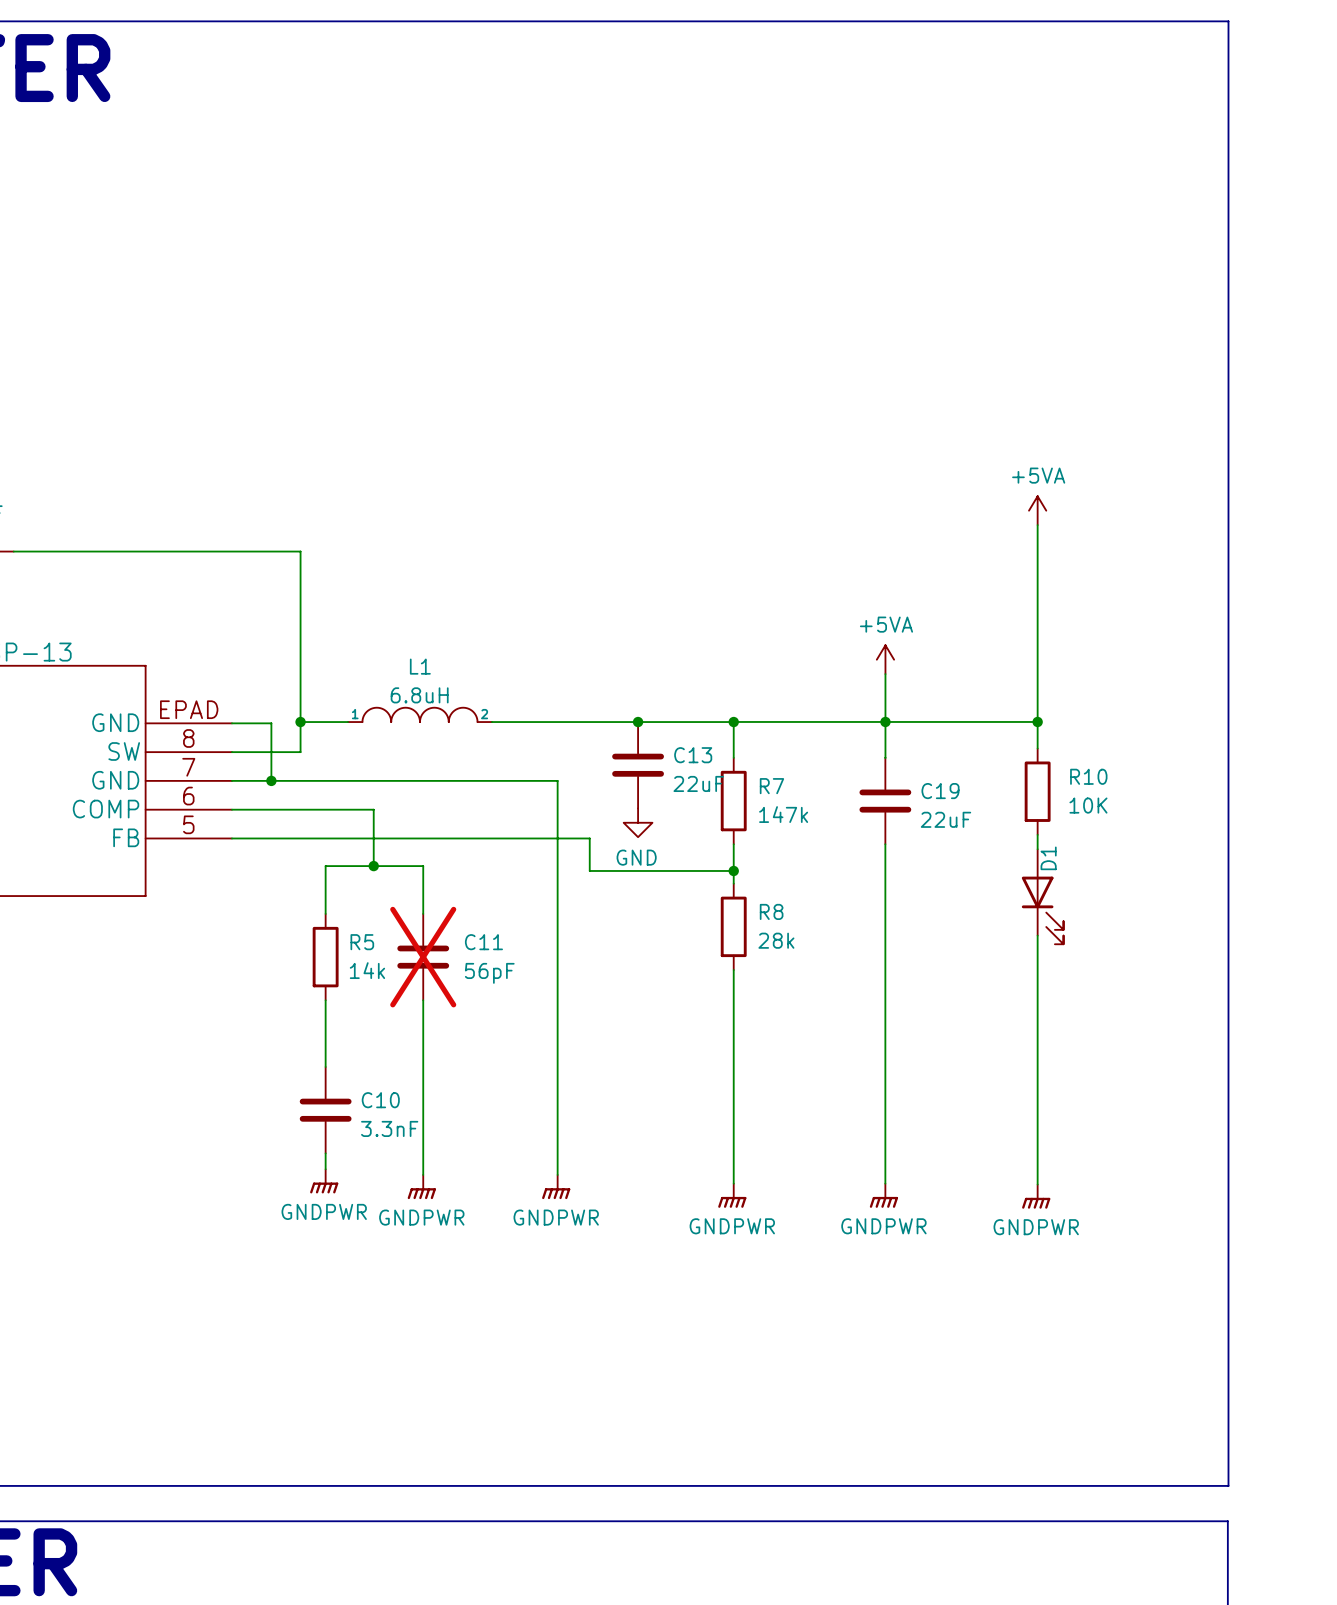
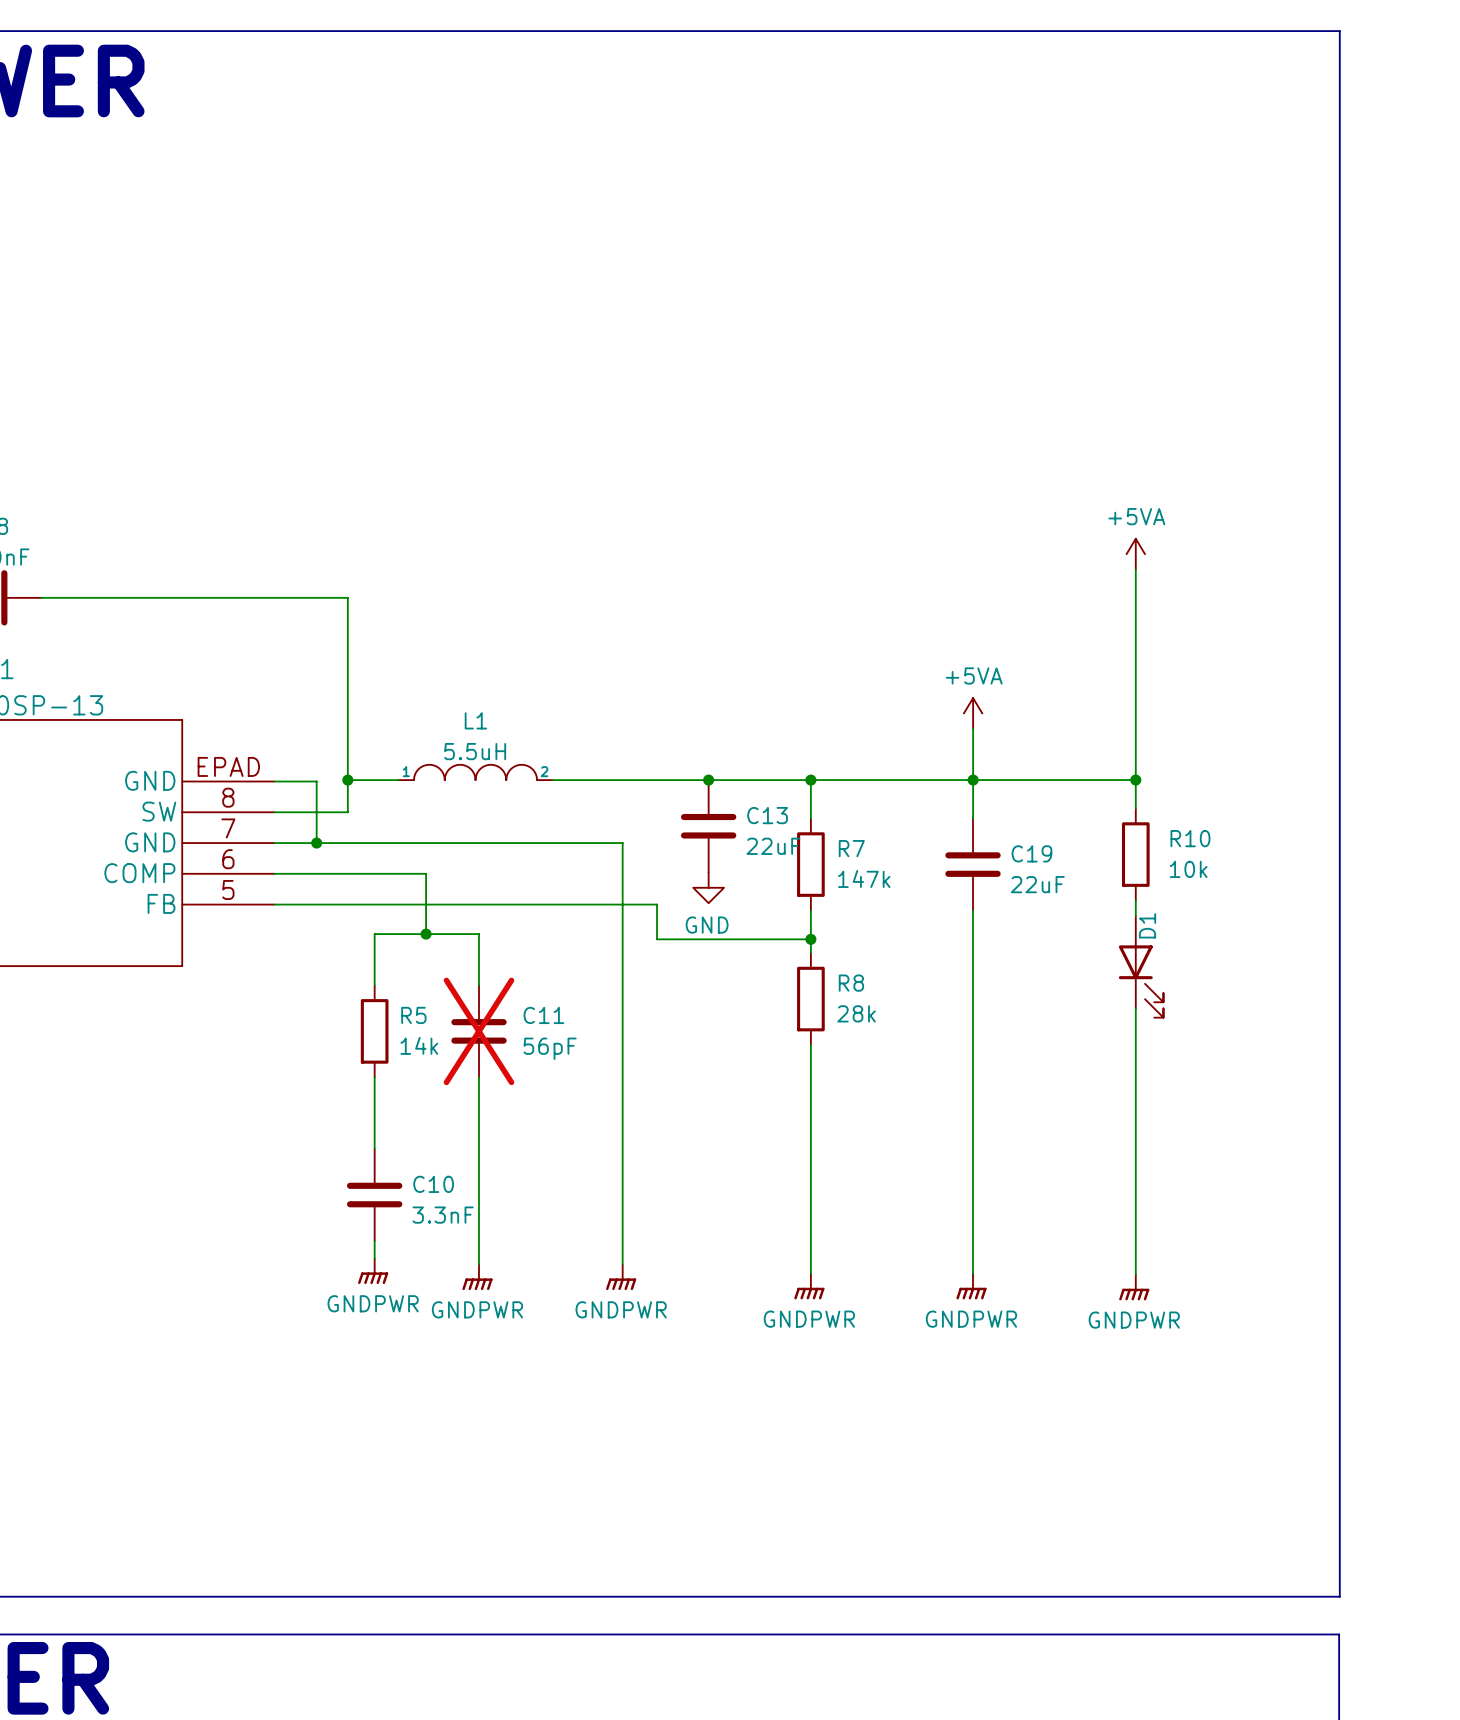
L1 value: 6.8uH (419, 695) -> 5.5uH (475, 751)
R10 value: 10K (1088, 805) -> 10k (1188, 869)

